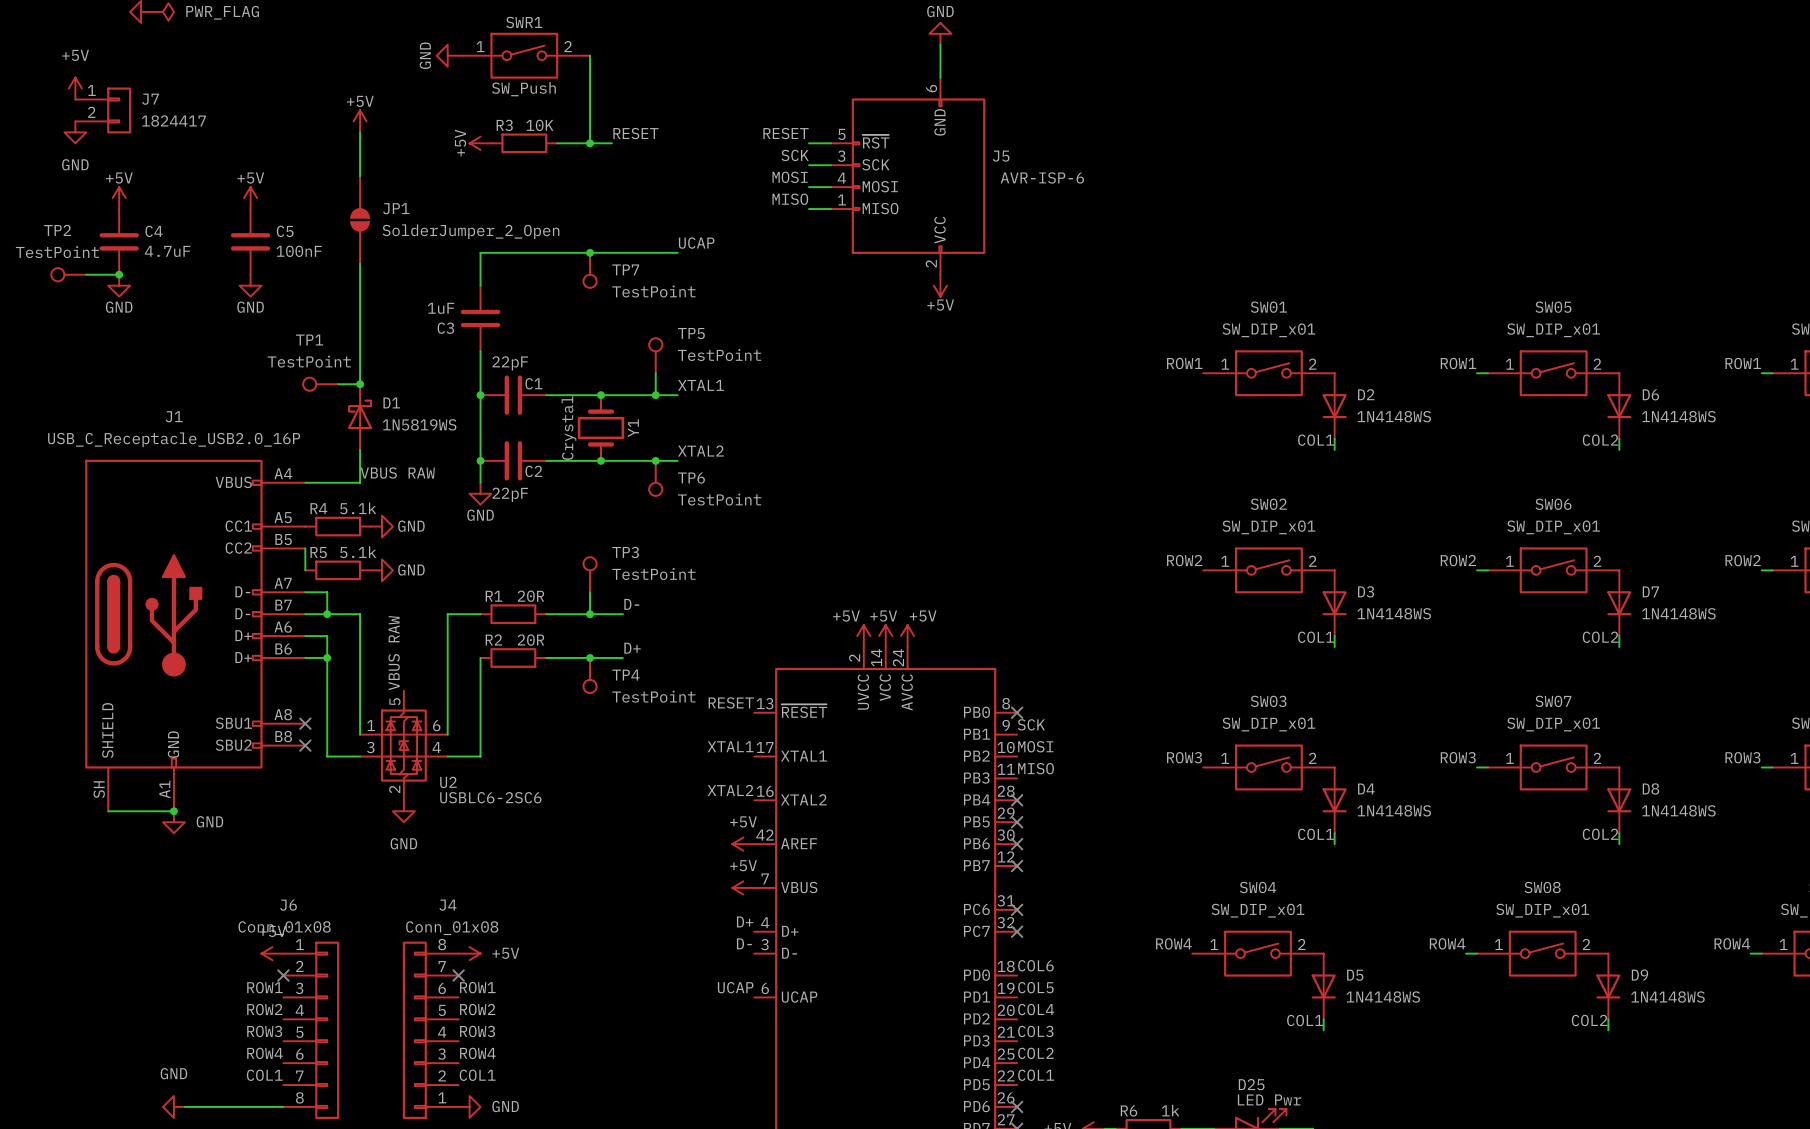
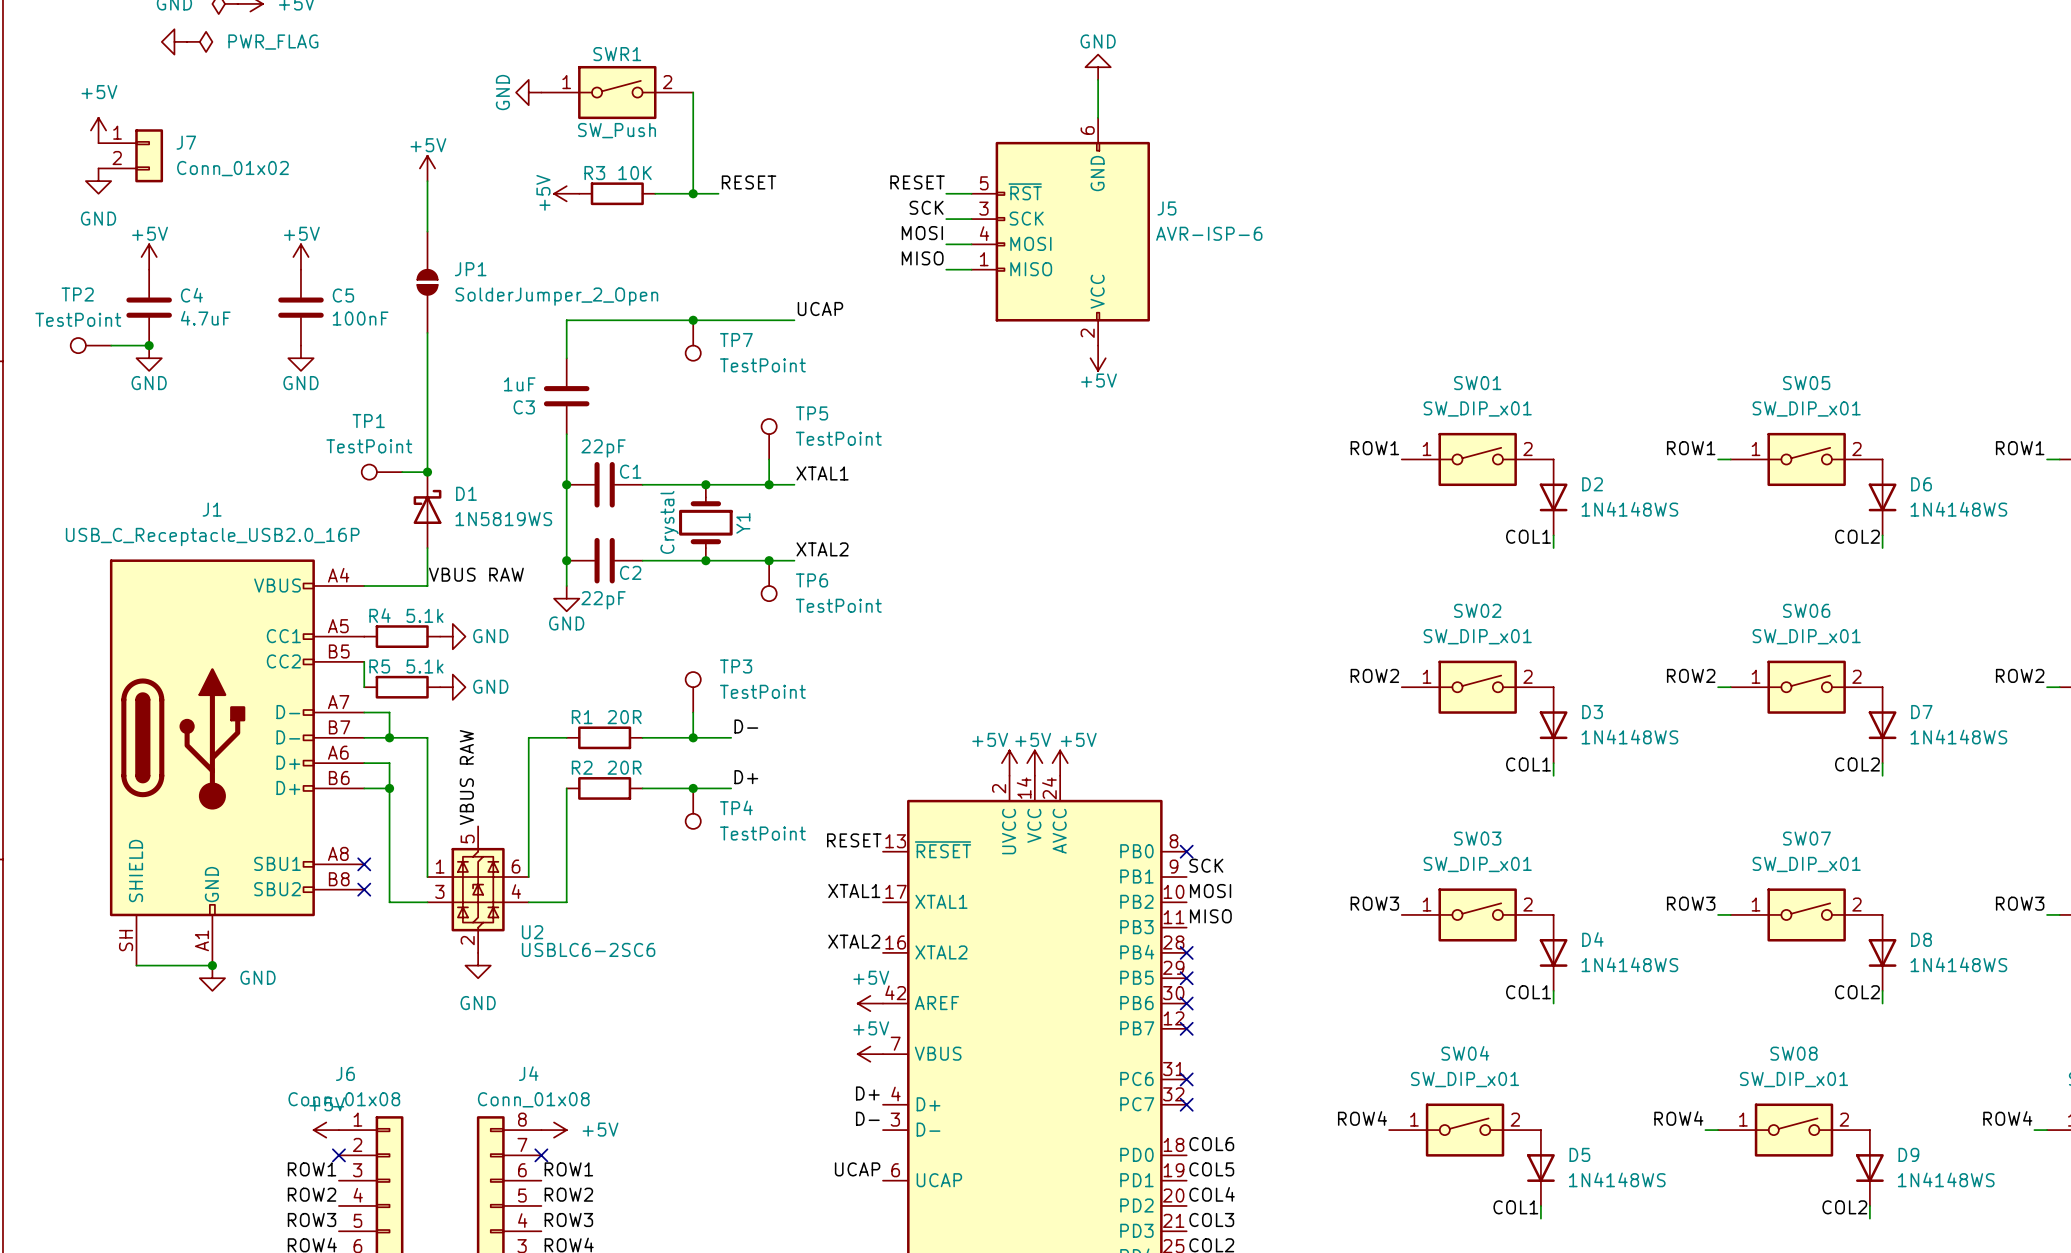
J7 value: 1824417 (173, 121) -> Conn_01x02 (232, 168)

